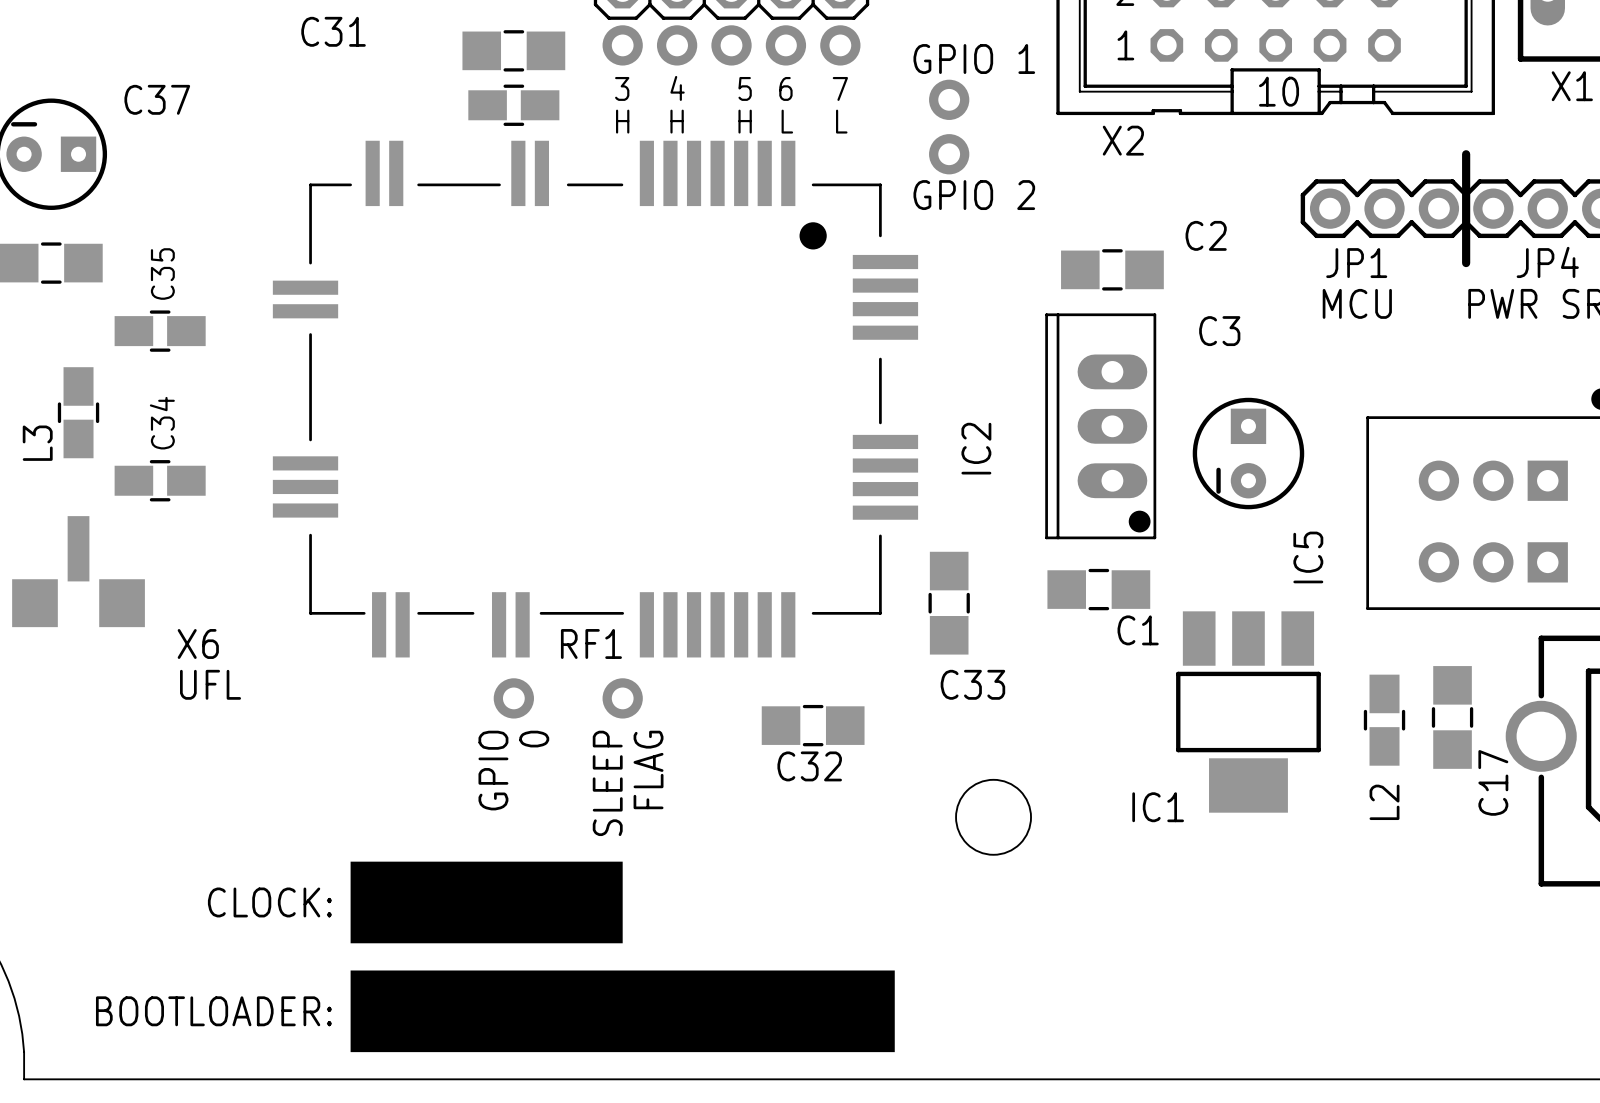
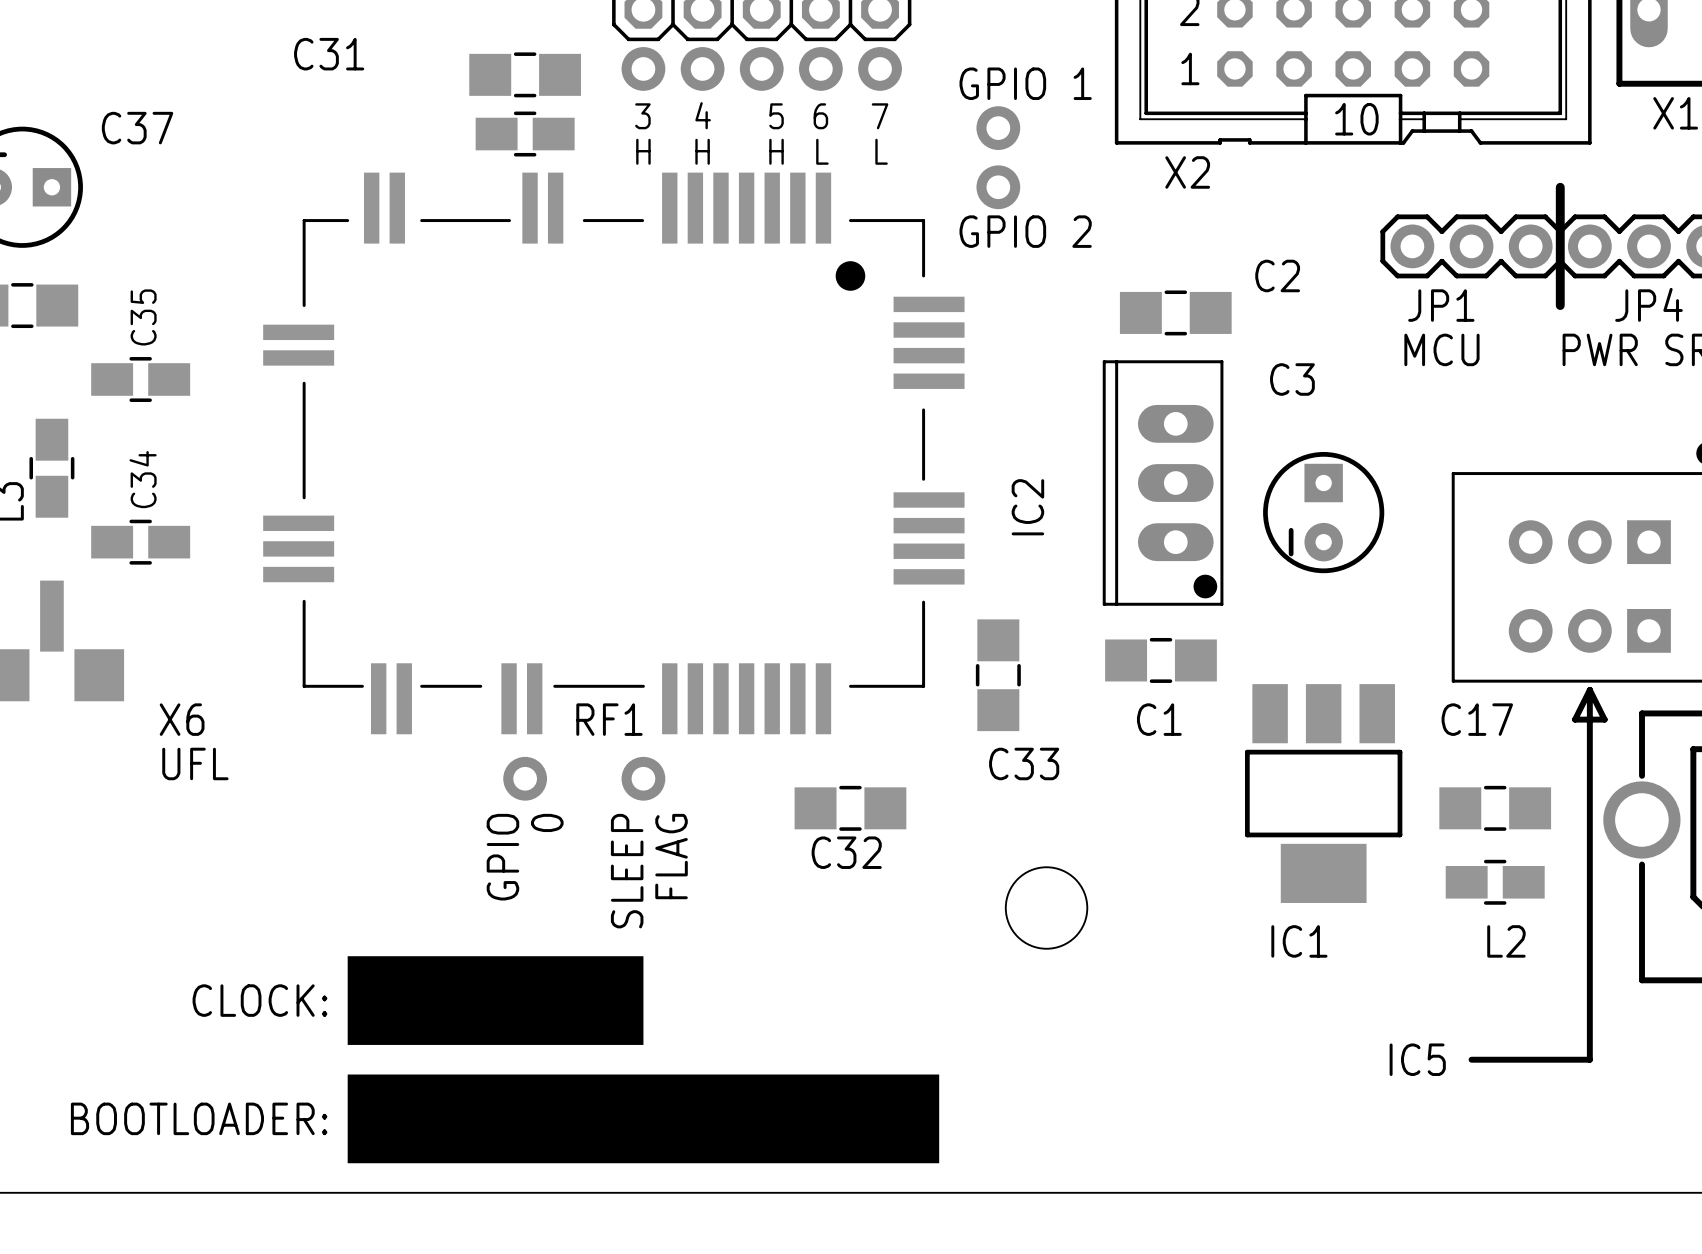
IC5 name rotation: 0° (1308, 557) -> 90° clockwise (1417, 1059)
IC5 name position: IC5 (1308, 557) -> IC5 (1417, 1059)
line: none -> (1589, 690) (1589, 1059) (1471, 1059)
line: none -> (1589, 690) (1575, 719) (1604, 719) (1589, 690)
C1 name position: C1 (1138, 630) -> C1 (1159, 719)
C17 rotation: 0° (1452, 717) -> 90° clockwise (1495, 808)
L2 rotation: 0° (1384, 720) -> 90° clockwise (1495, 882)
L2 position: (1384, 720) -> (1495, 882)
C17 name position: C17 (1493, 782) -> C17 (1477, 719)
IC1 name position: IC1 (1158, 807) -> IC1 (1299, 941)

